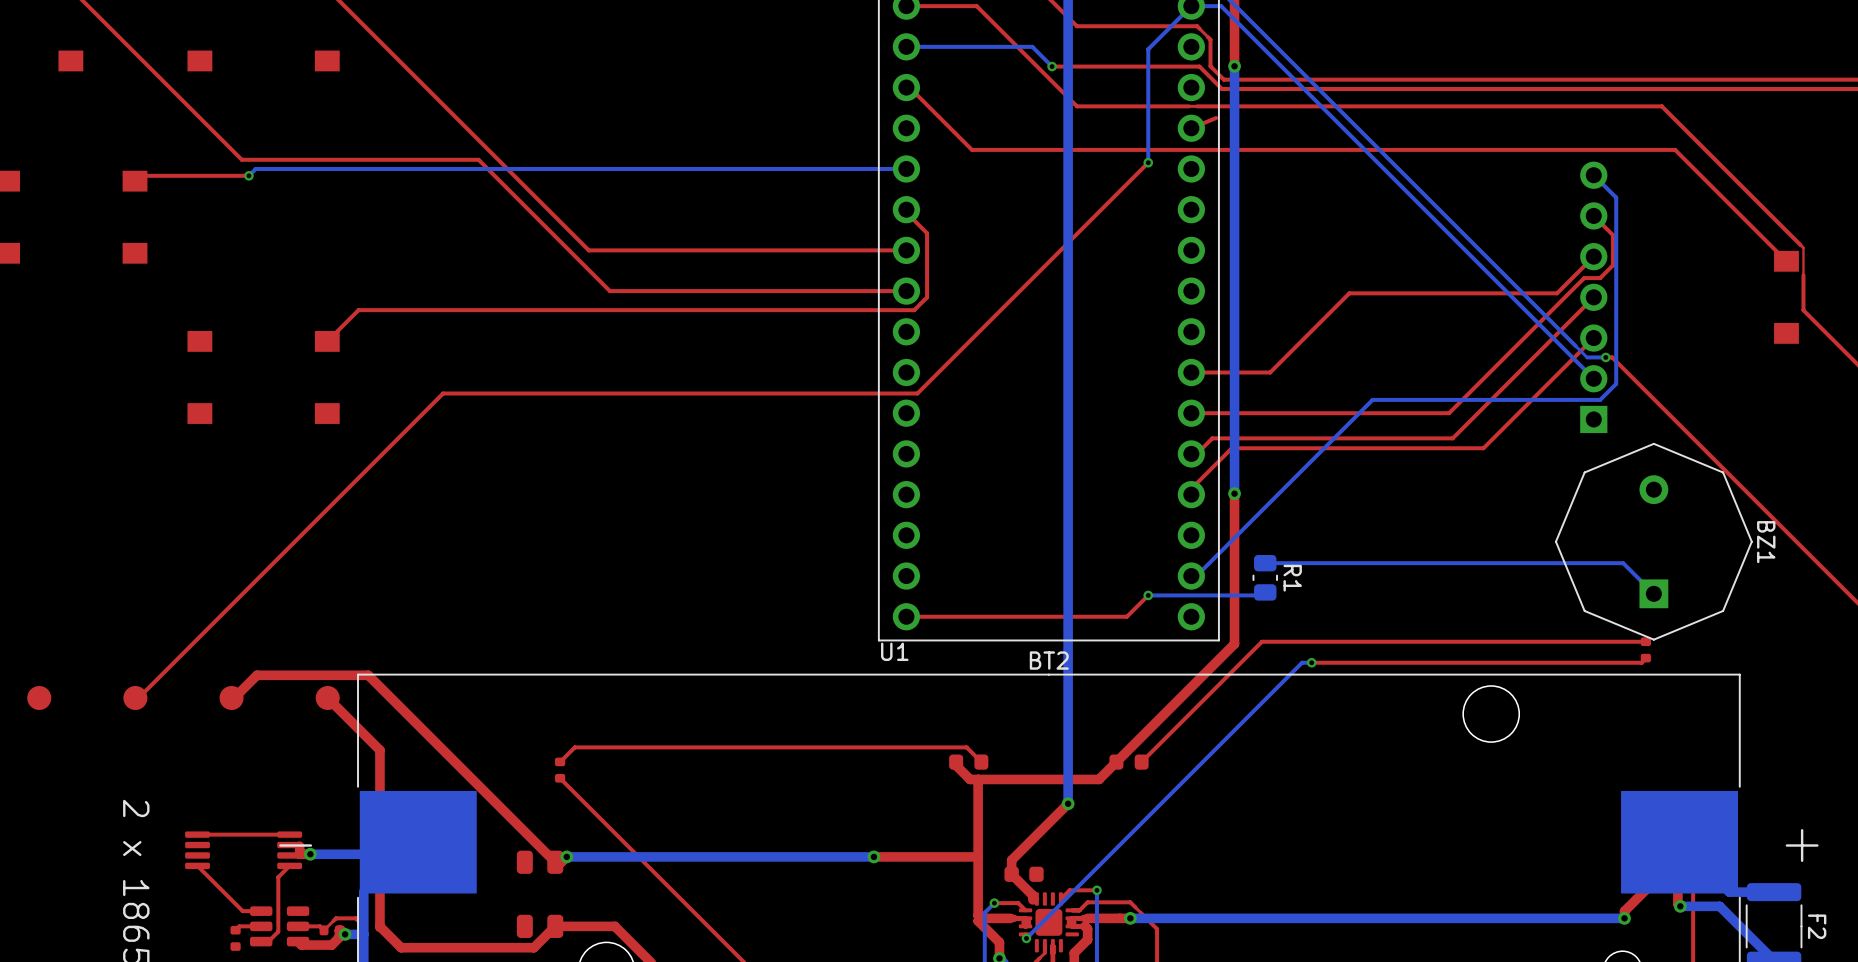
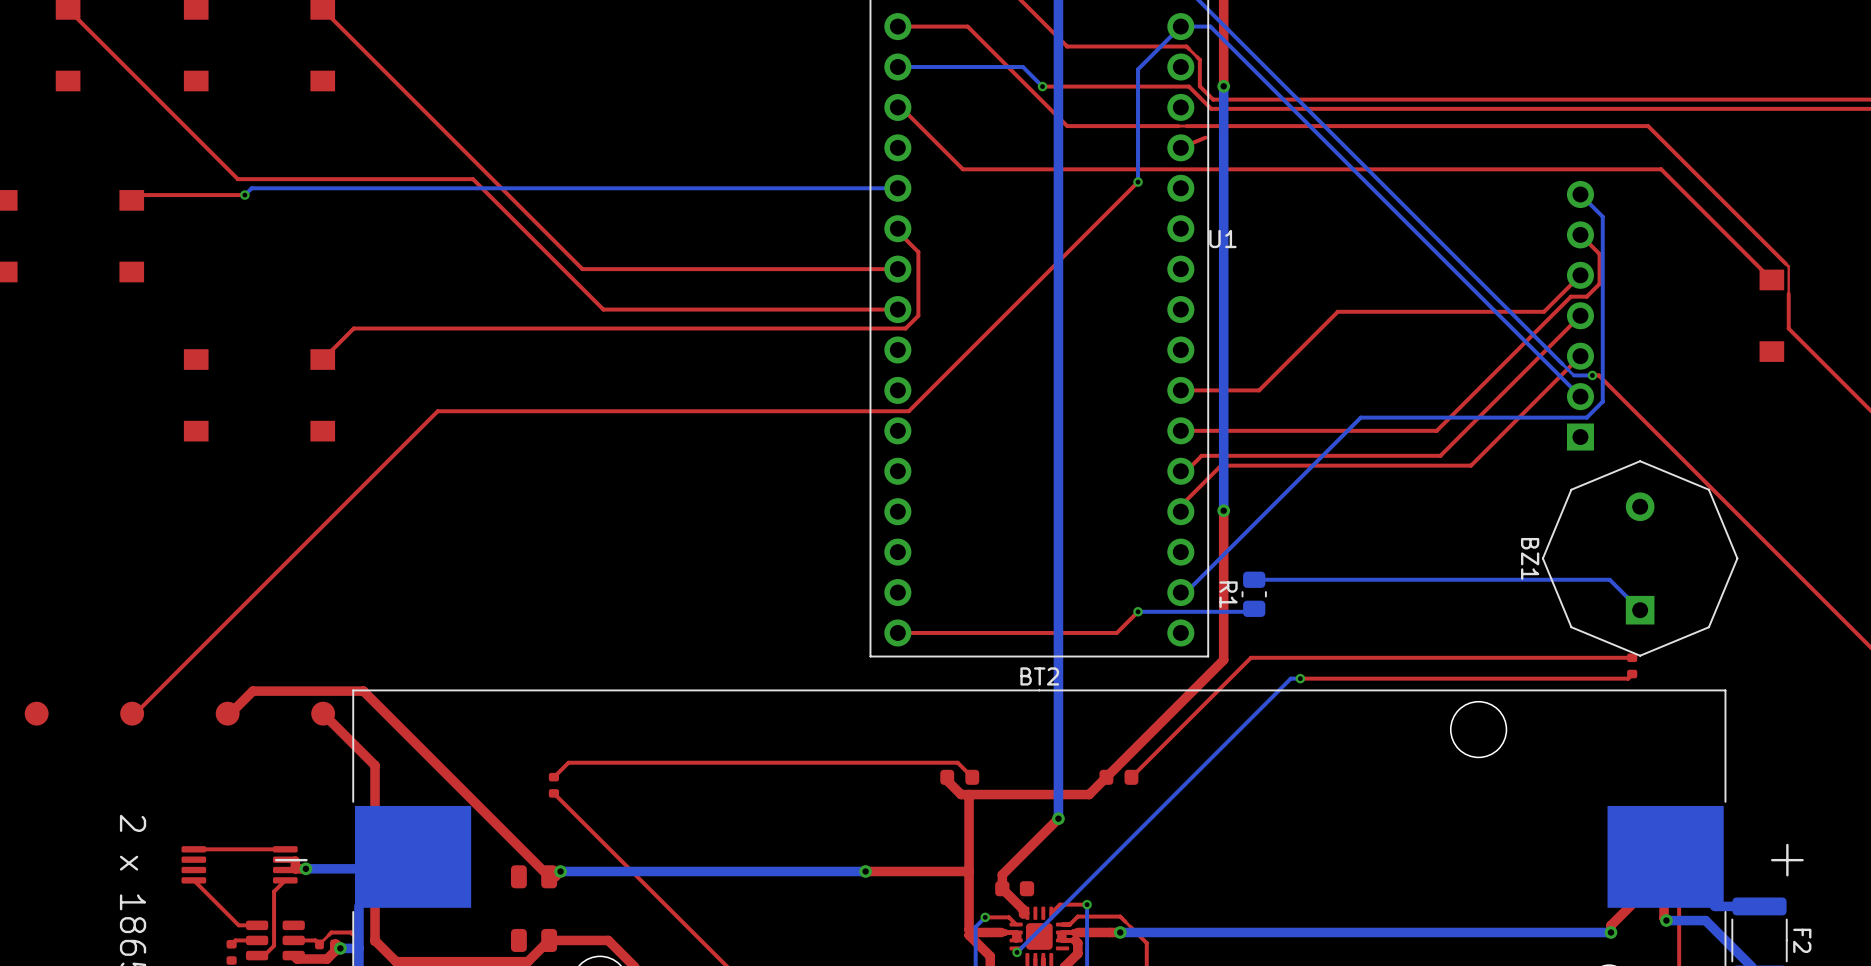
BZ1 name position: BZ1 (1766, 542) -> BZ1 (1530, 558)
R1 name position: R1 (1292, 578) -> R1 (1228, 594)
U1 name position: U1 (894, 651) -> U1 (1222, 239)

